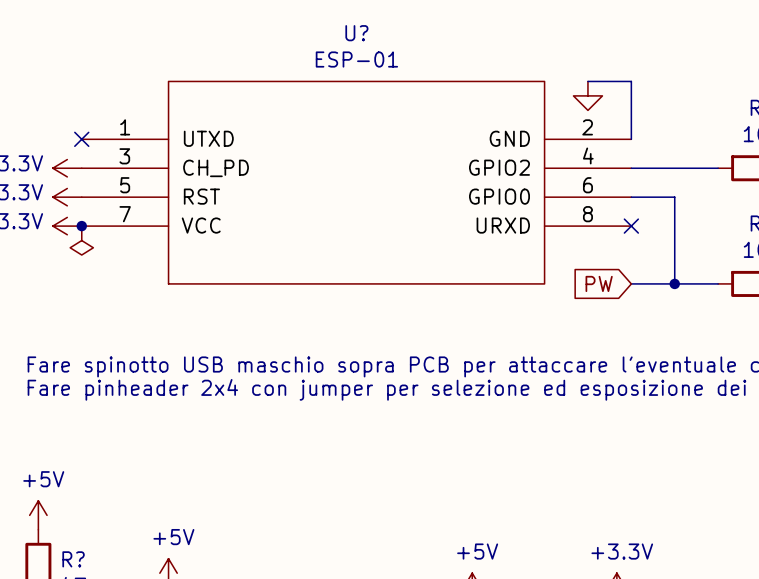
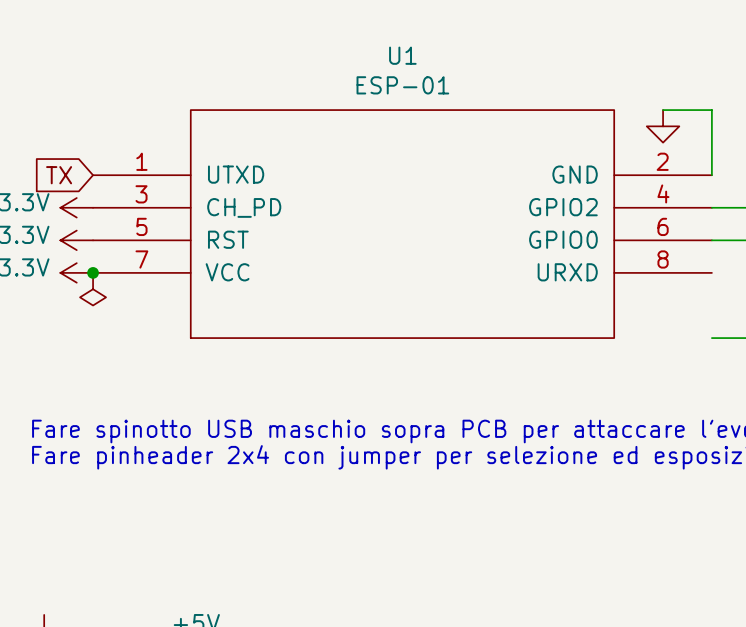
U? name: U? (356, 33) -> U1 (402, 55)
global label: none -> TX (59, 175)
no-connect mark: (81, 139) -> none
no-connect mark: (631, 226) -> none
global label: PW (599, 283) -> none
power symbol: +5V (38, 515) -> none

